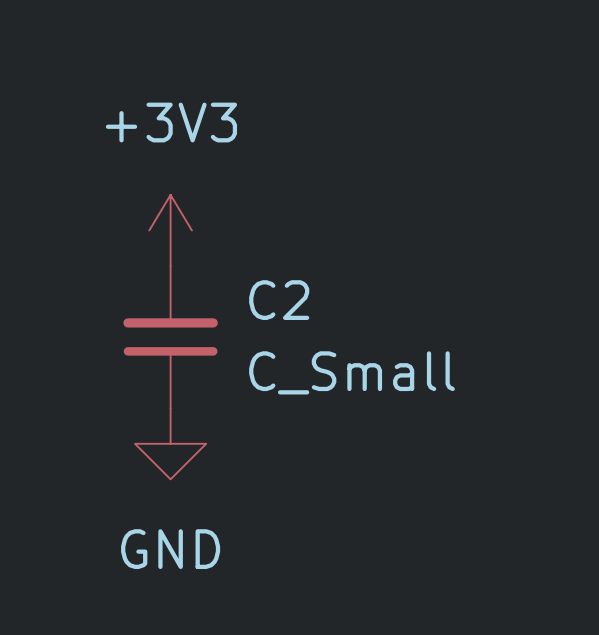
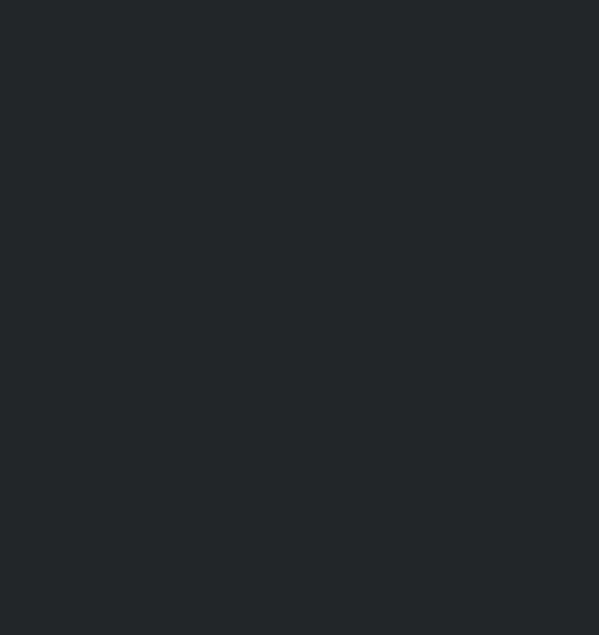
power symbol: +3V3 (170, 230) -> none
C2: C_Small (170, 337) -> none
power symbol: GND (170, 443) -> none

